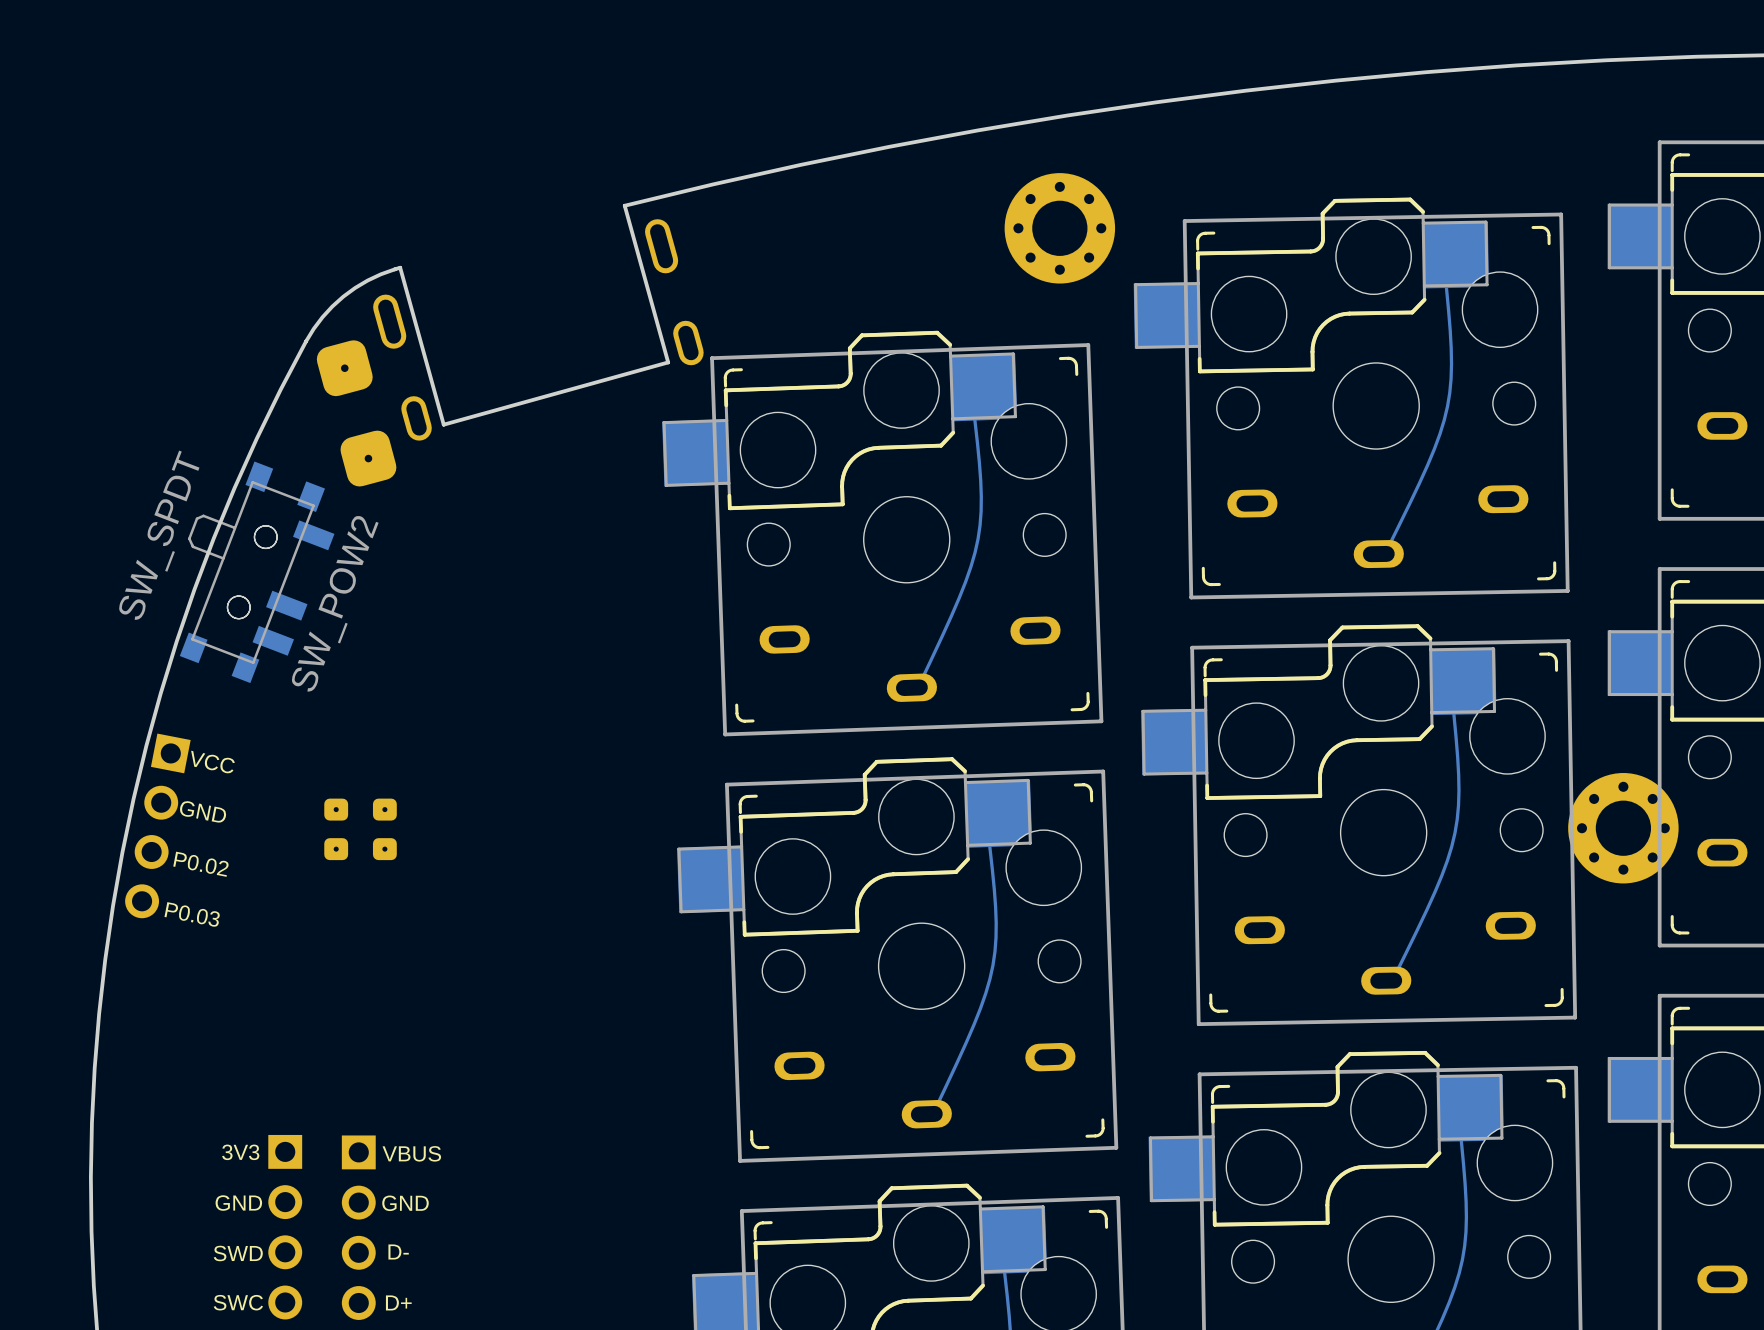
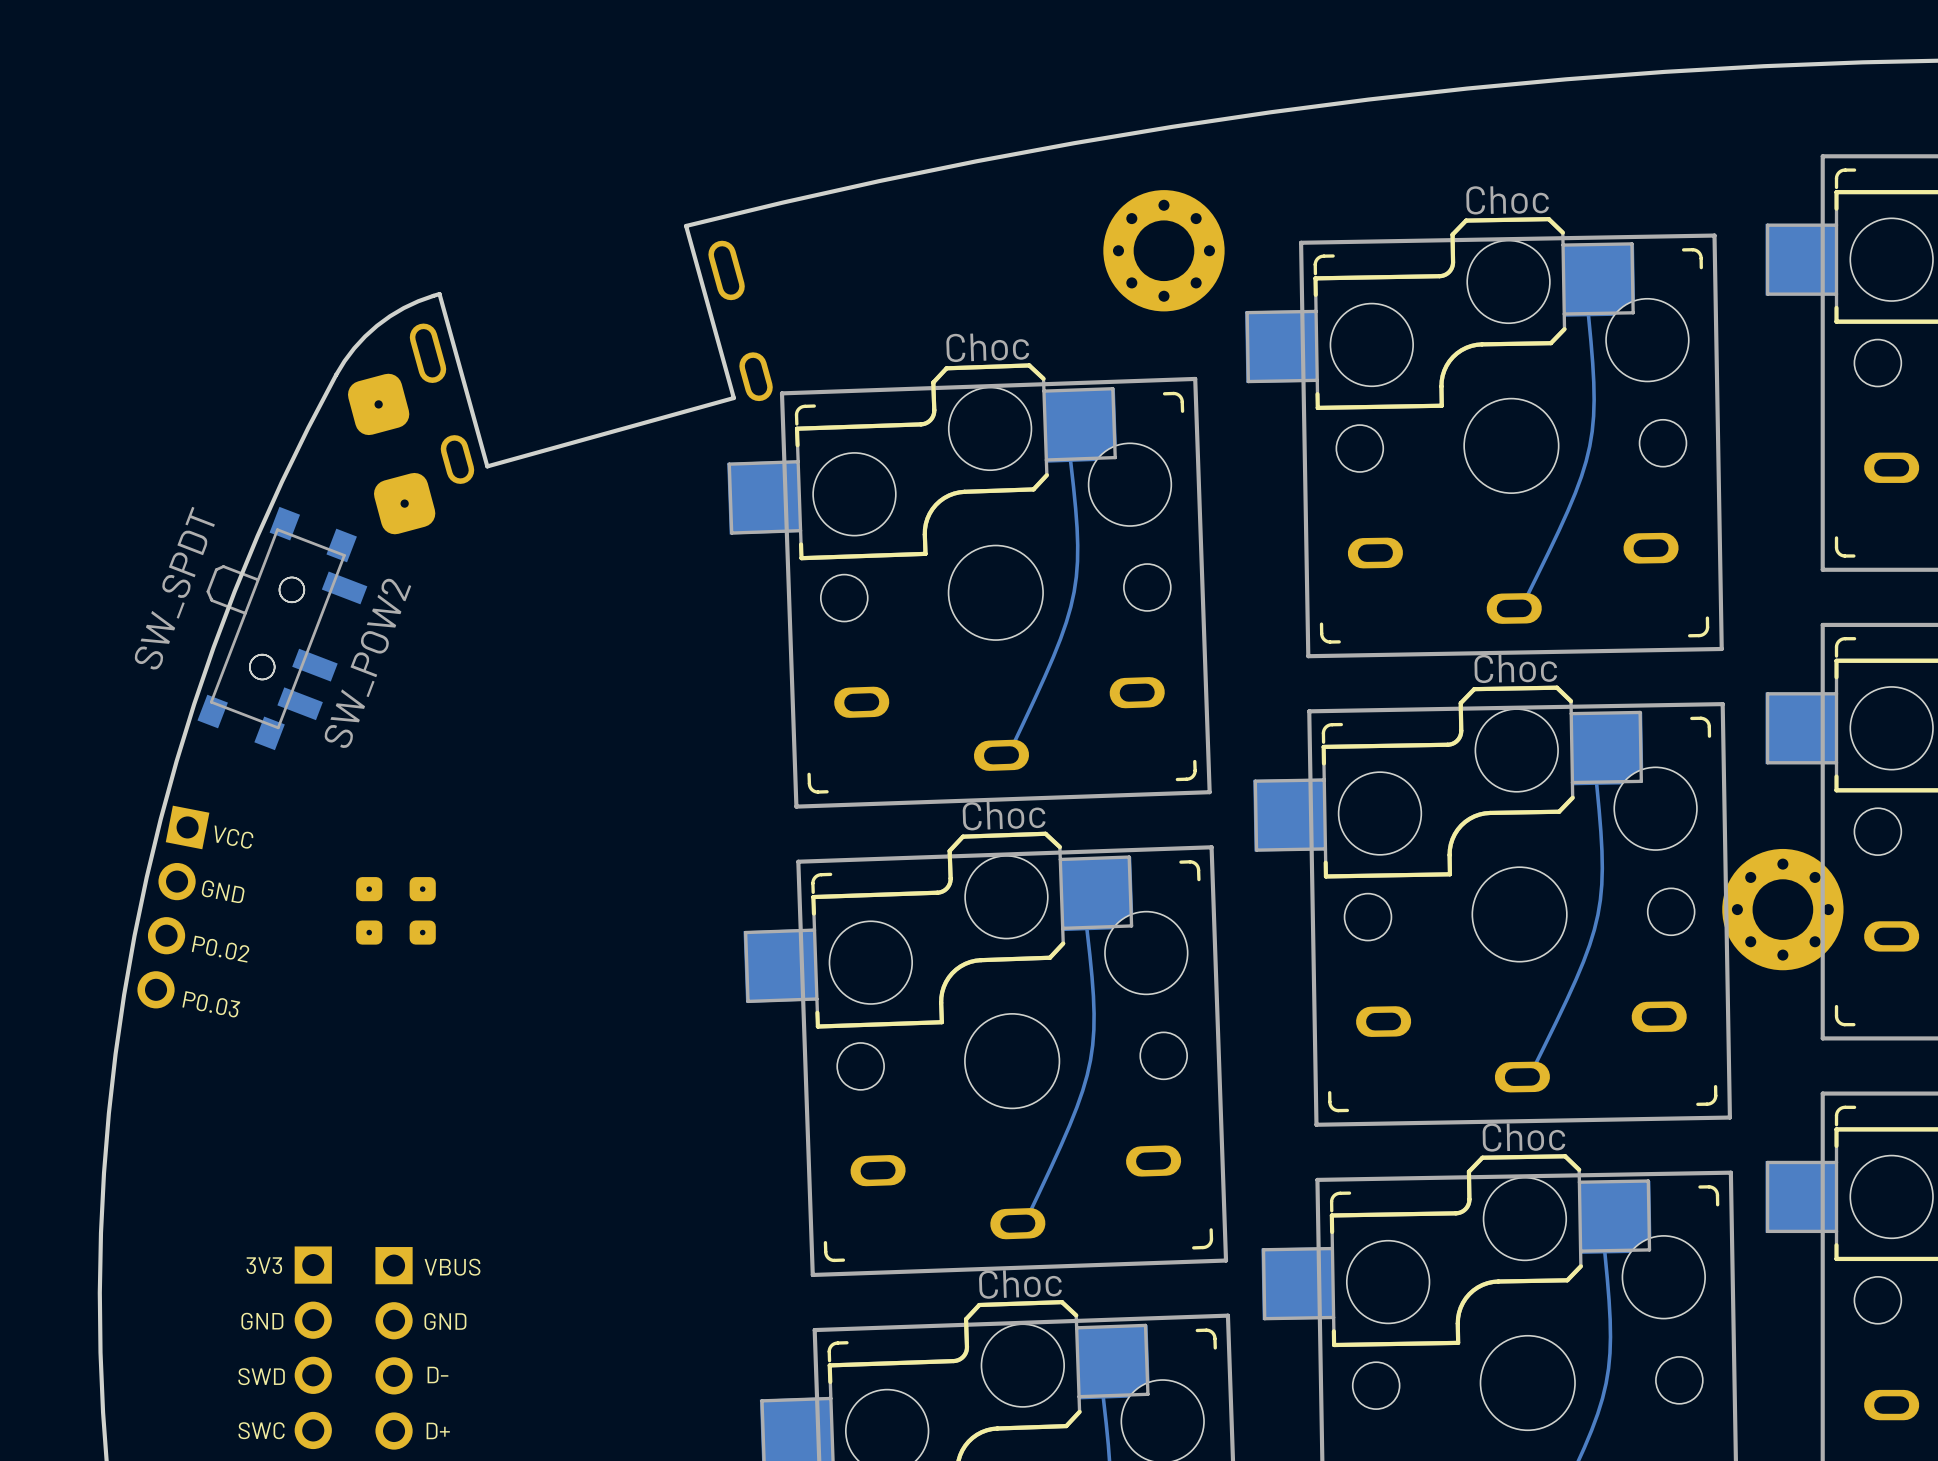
part value: none -> Choc (1507, 200)
part value: none -> Choc (987, 347)
part value: none -> Choc (1515, 668)
part value: none -> Choc (1004, 816)
part value: none -> Choc (1523, 1137)
part value: none -> Choc (1020, 1284)

